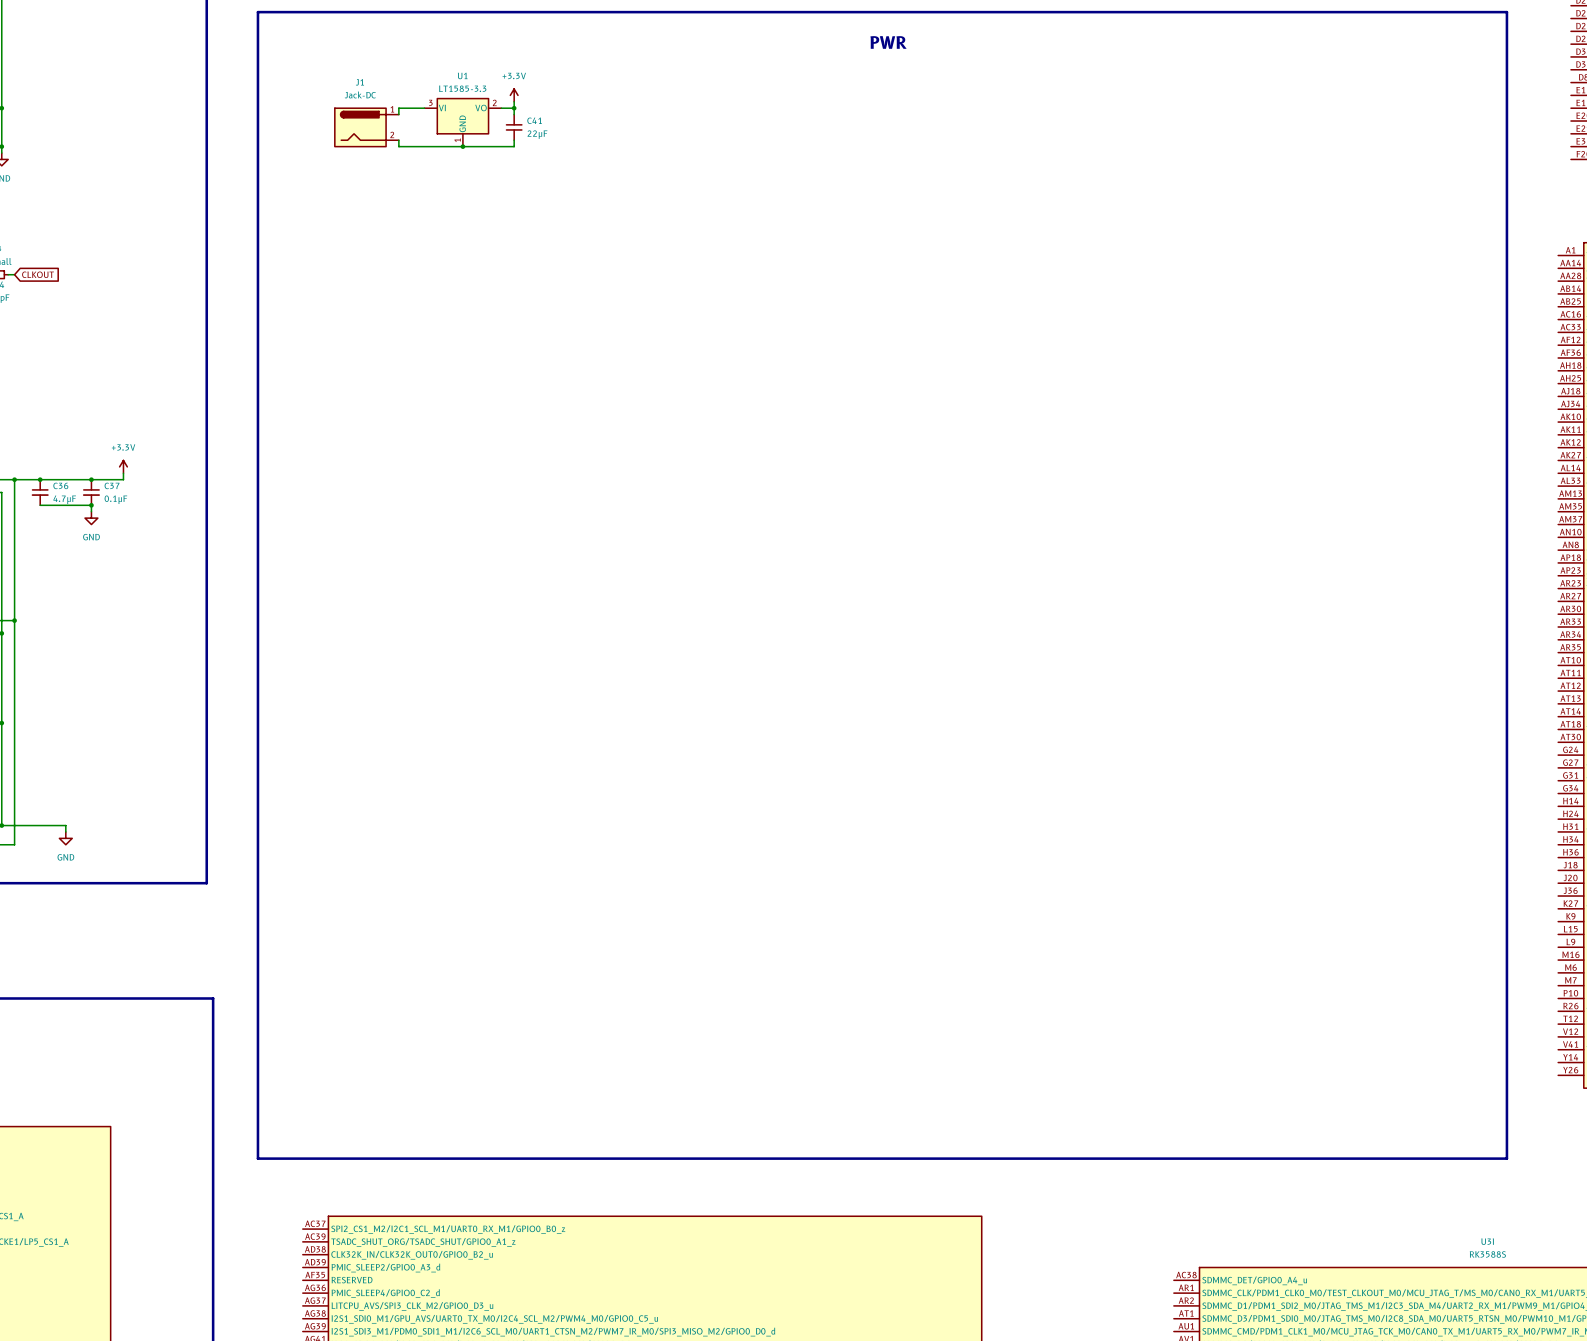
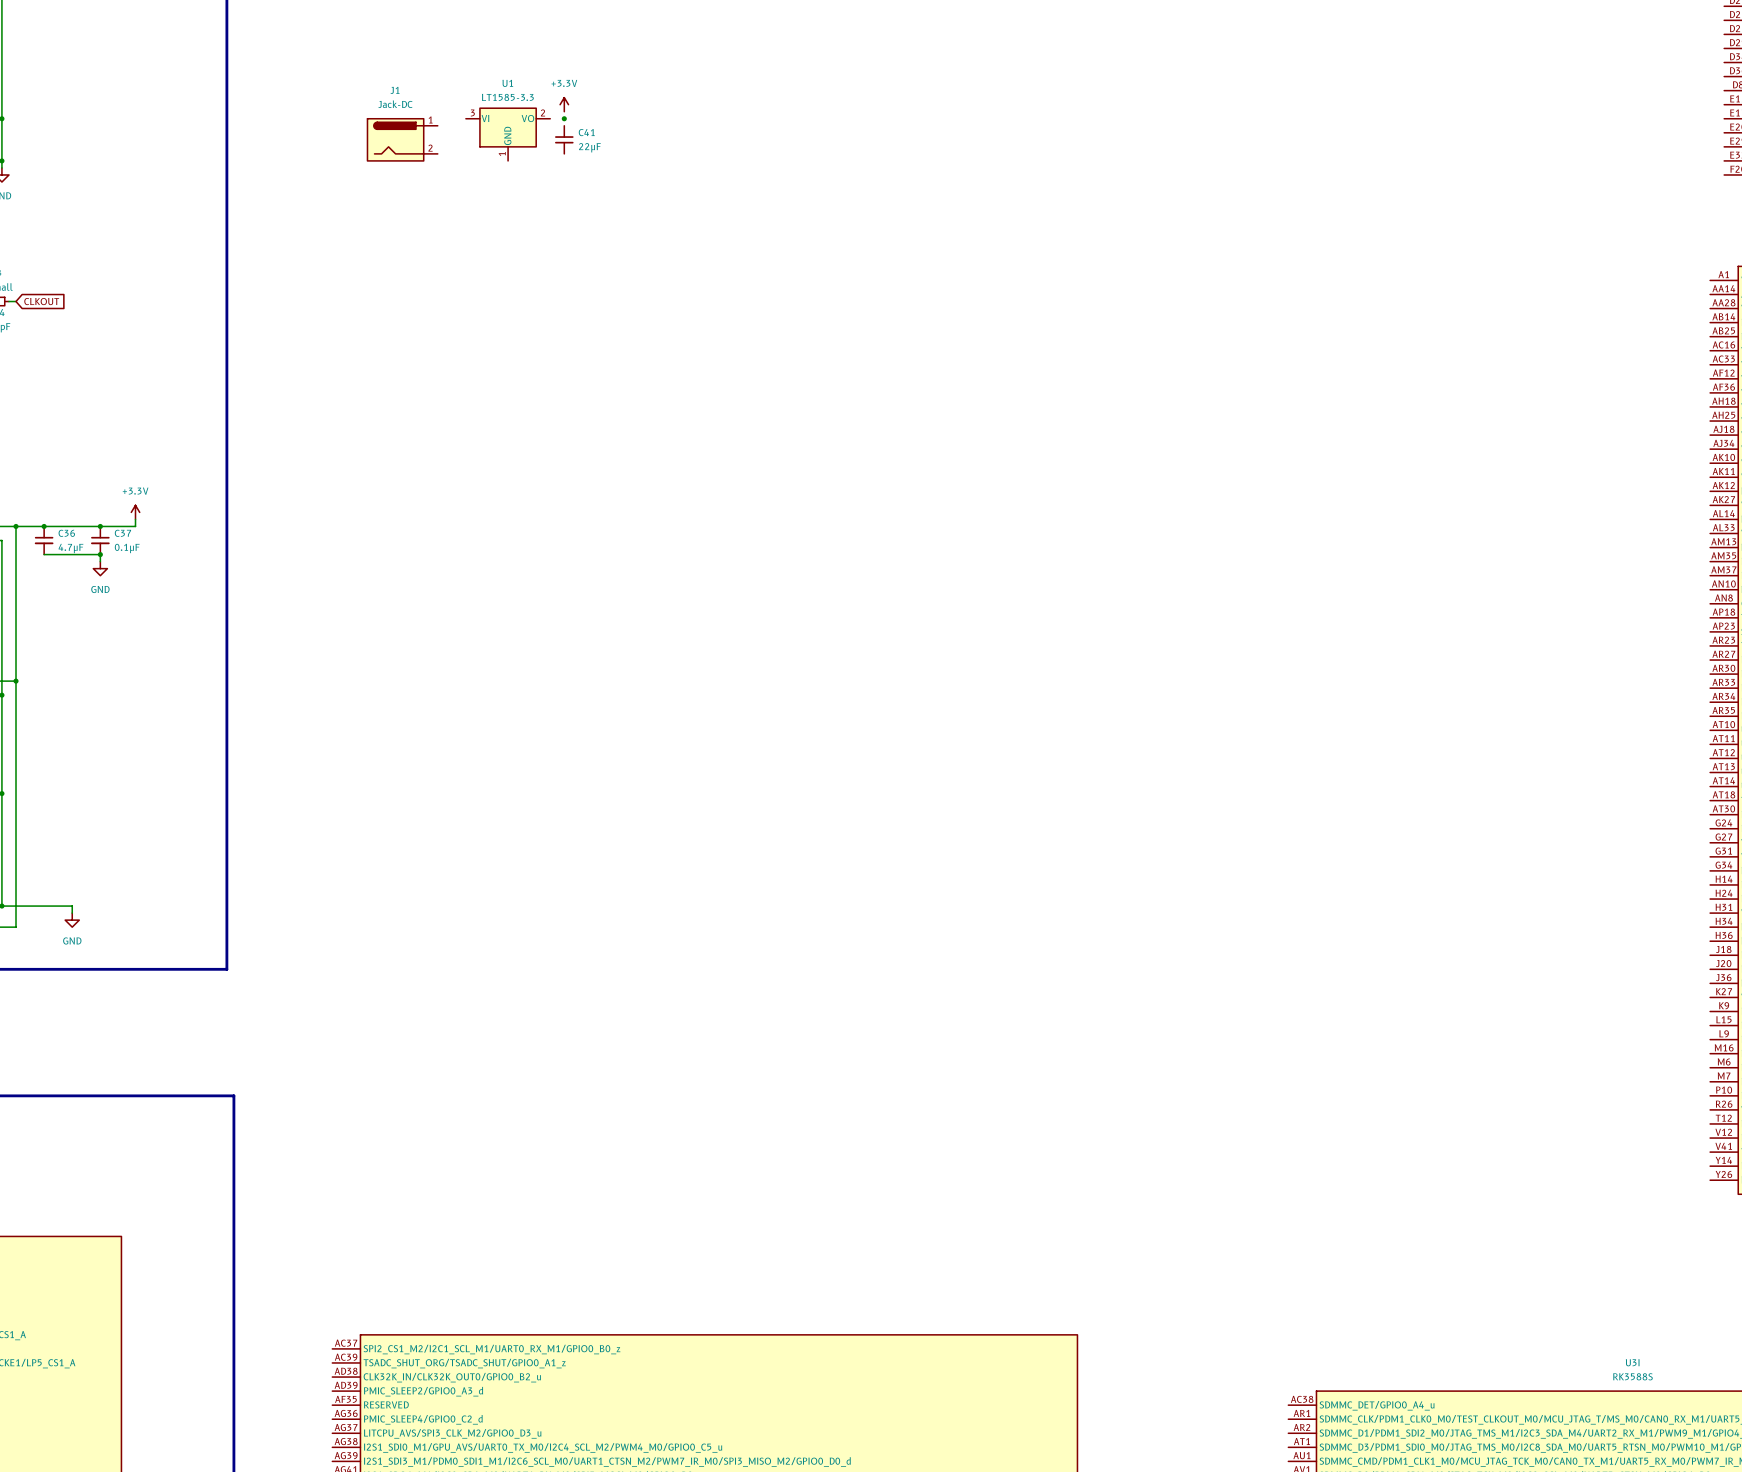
line: (257, 12) (1506, 12) (1506, 1158) (257, 1158) (257, 12) -> none
text: PWR (888, 42) -> none
wire: (514, 101) (514, 114) -> none
wire: (424, 108) (398, 108) (398, 114) -> none
wire: (501, 108) (514, 108) -> none
wire: (398, 140) (398, 146) (514, 146) (514, 140) -> none
junction: (462, 146) -> none

